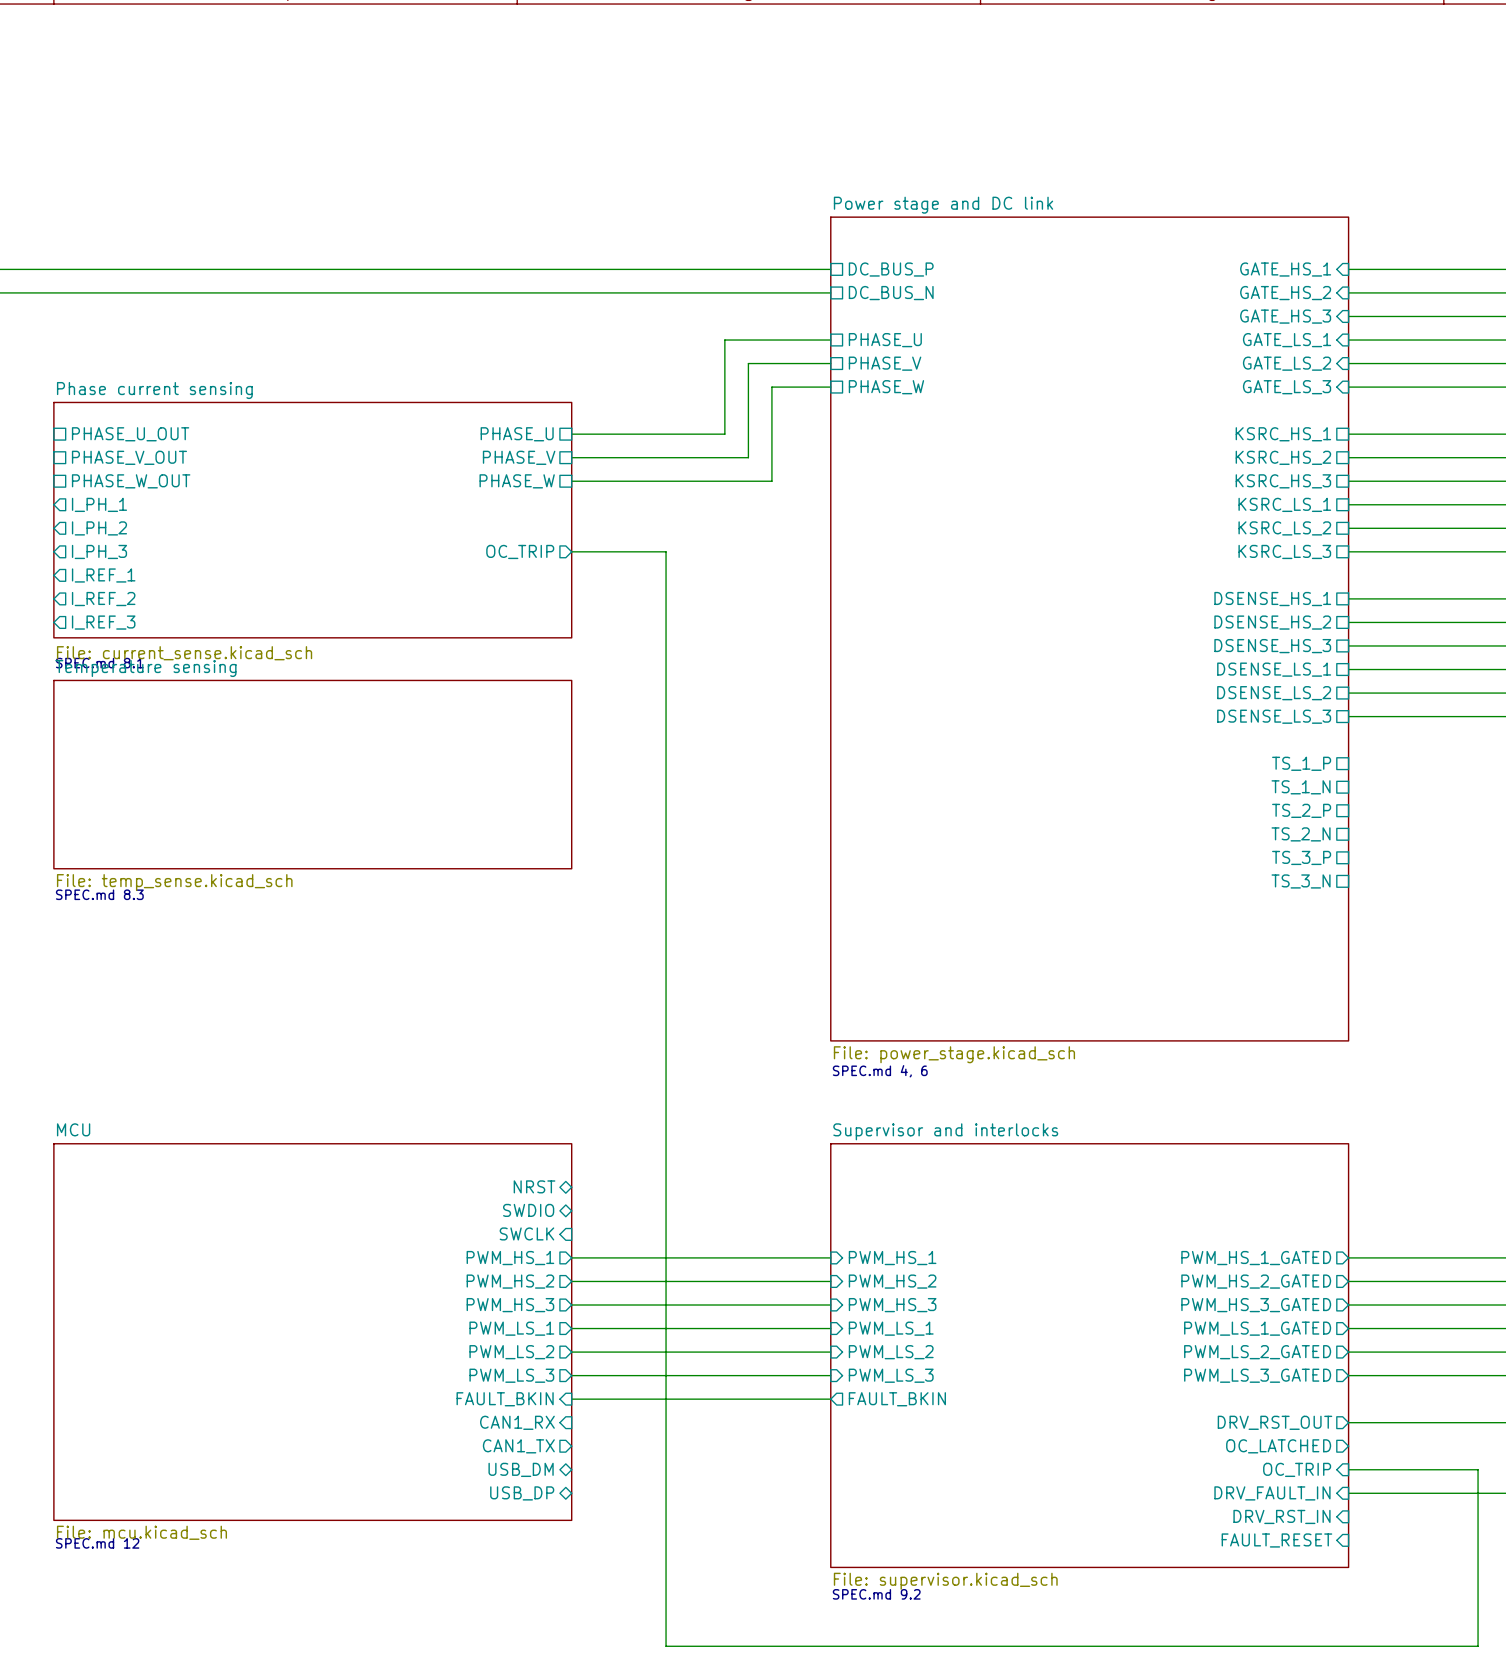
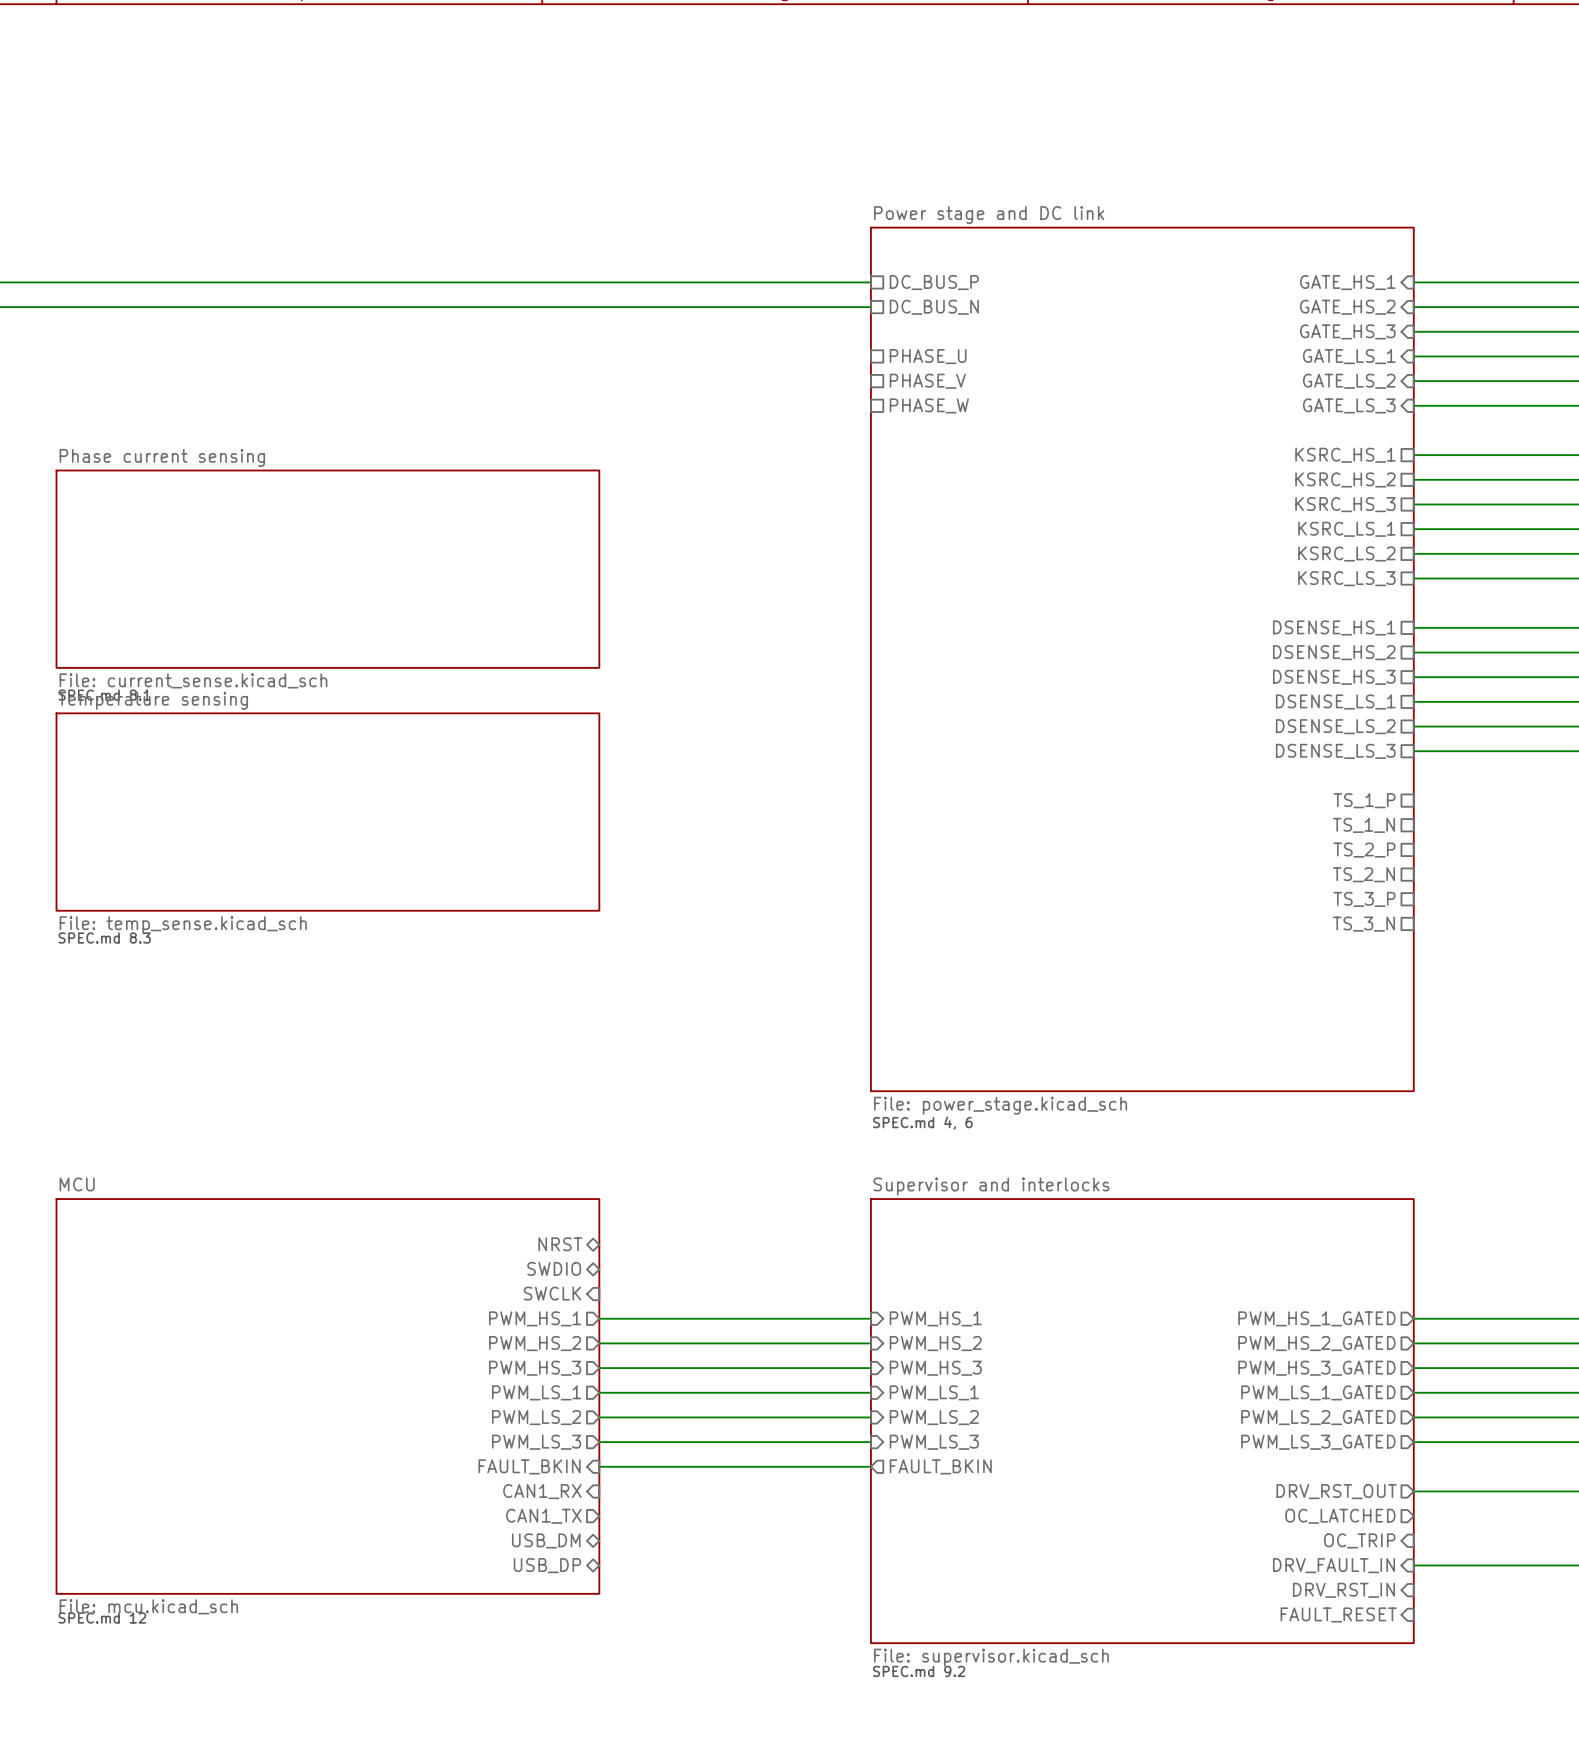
wire: (830, 340) (724, 340) (724, 434) (571, 434) -> none
wire: (830, 363) (748, 363) (748, 457) (571, 457) -> none
wire: (830, 387) (771, 387) (771, 481) (571, 481) -> none
sheet pin: PHASE_U_OUT (130, 434) -> none
sheet pin: PHASE_U (517, 434) -> none
sheet pin: PHASE_V_OUT (129, 457) -> none
sheet pin: PHASE_V (519, 457) -> none
sheet pin: PHASE_W_OUT (131, 481) -> none
sheet pin: PHASE_W (517, 481) -> none
sheet pin: I_PH_1 (99, 504) -> none
sheet Phase current sensing: File: current_sense.kicad_sch (312, 520) -> none
sheet pin: I_PH_2 (99, 528) -> none
sheet Phase current sensing: none -> File: current_sense.kicad_sch (327, 569)
sheet pin: I_PH_3 (99, 551) -> none
sheet pin: OC_TRIP (520, 551) -> none
wire: (571, 551) (666, 551) (666, 1646) (1478, 1646) (1478, 1469) (1348, 1469) -> none
sheet pin: I_REF_1 (103, 575) -> none
sheet pin: I_REF_2 (103, 599) -> none
sheet pin: I_REF_3 (103, 622) -> none

